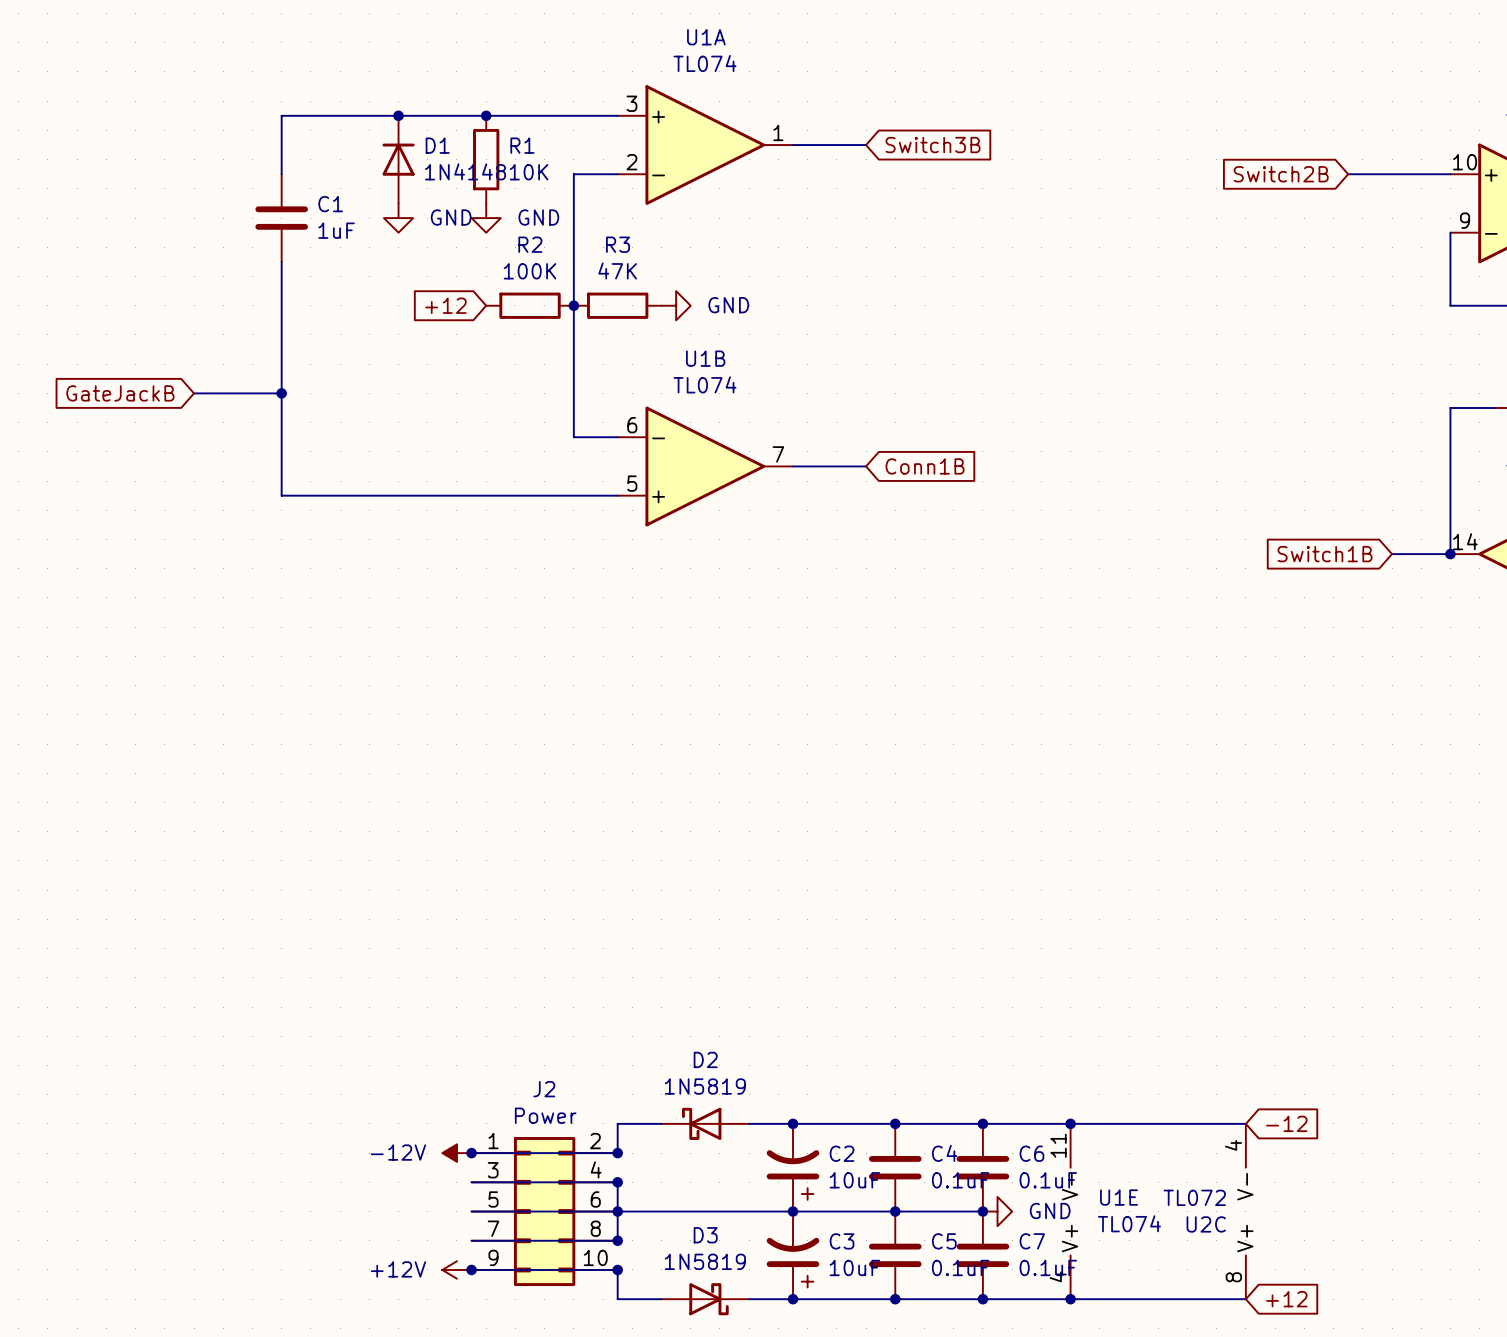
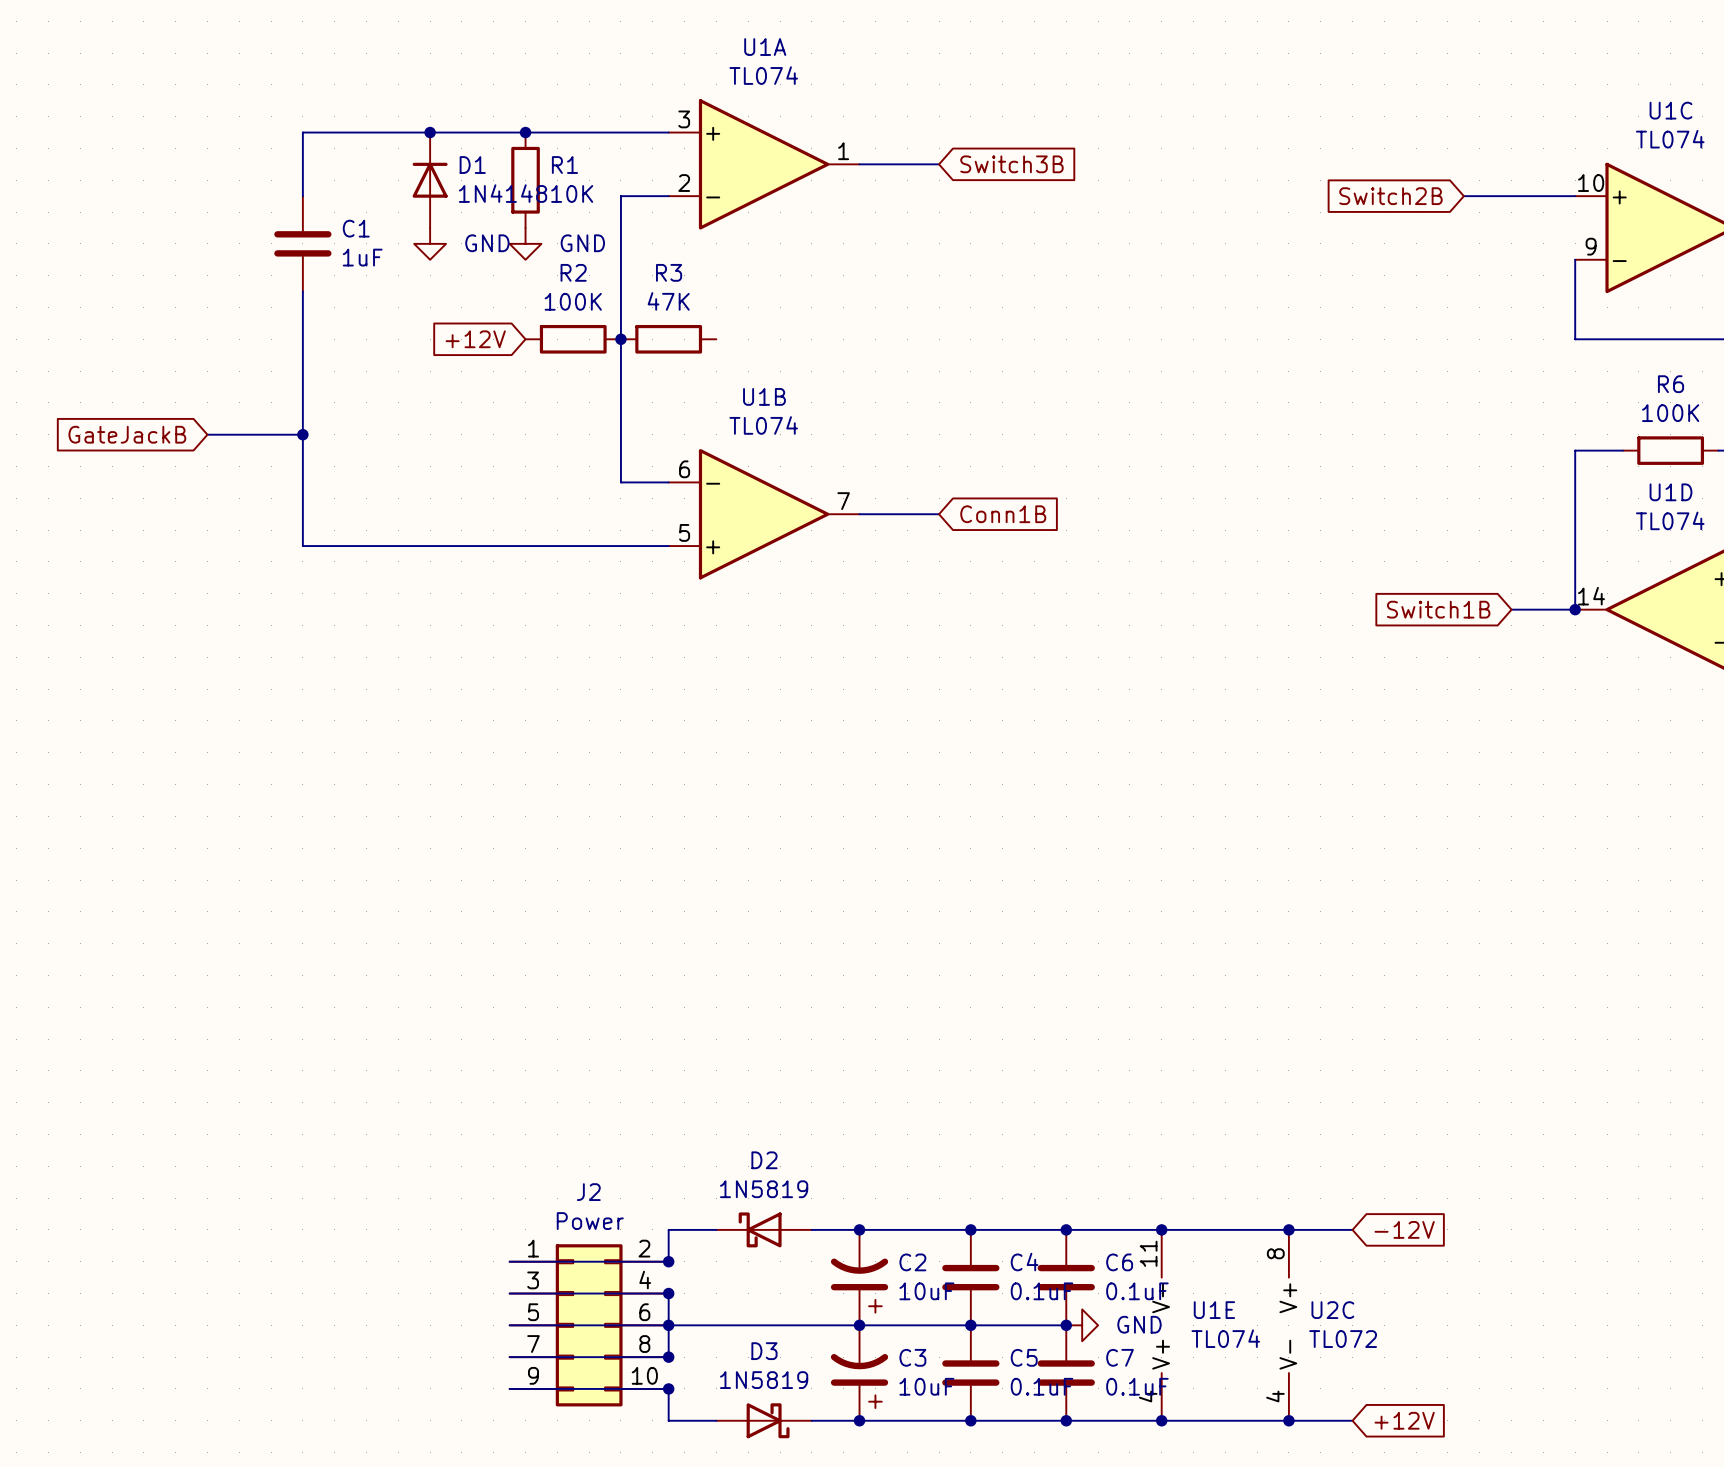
global label: +12 (446, 305) -> +12V (475, 339)
power symbol: GND (676, 305) -> none
junction: none -> (1288, 1229)
global label: -12 (1286, 1123) -> -12V (1404, 1229)
power symbol: -12V (456, 1153) -> none
junction: (471, 1153) -> none
U2C rotation: 0° (1245, 1211) -> 180° (1288, 1325)
power symbol: +12V (456, 1269) -> none
junction: (471, 1269) -> none
junction: none -> (1288, 1420)
global label: +12 (1286, 1299) -> +12V (1404, 1420)

